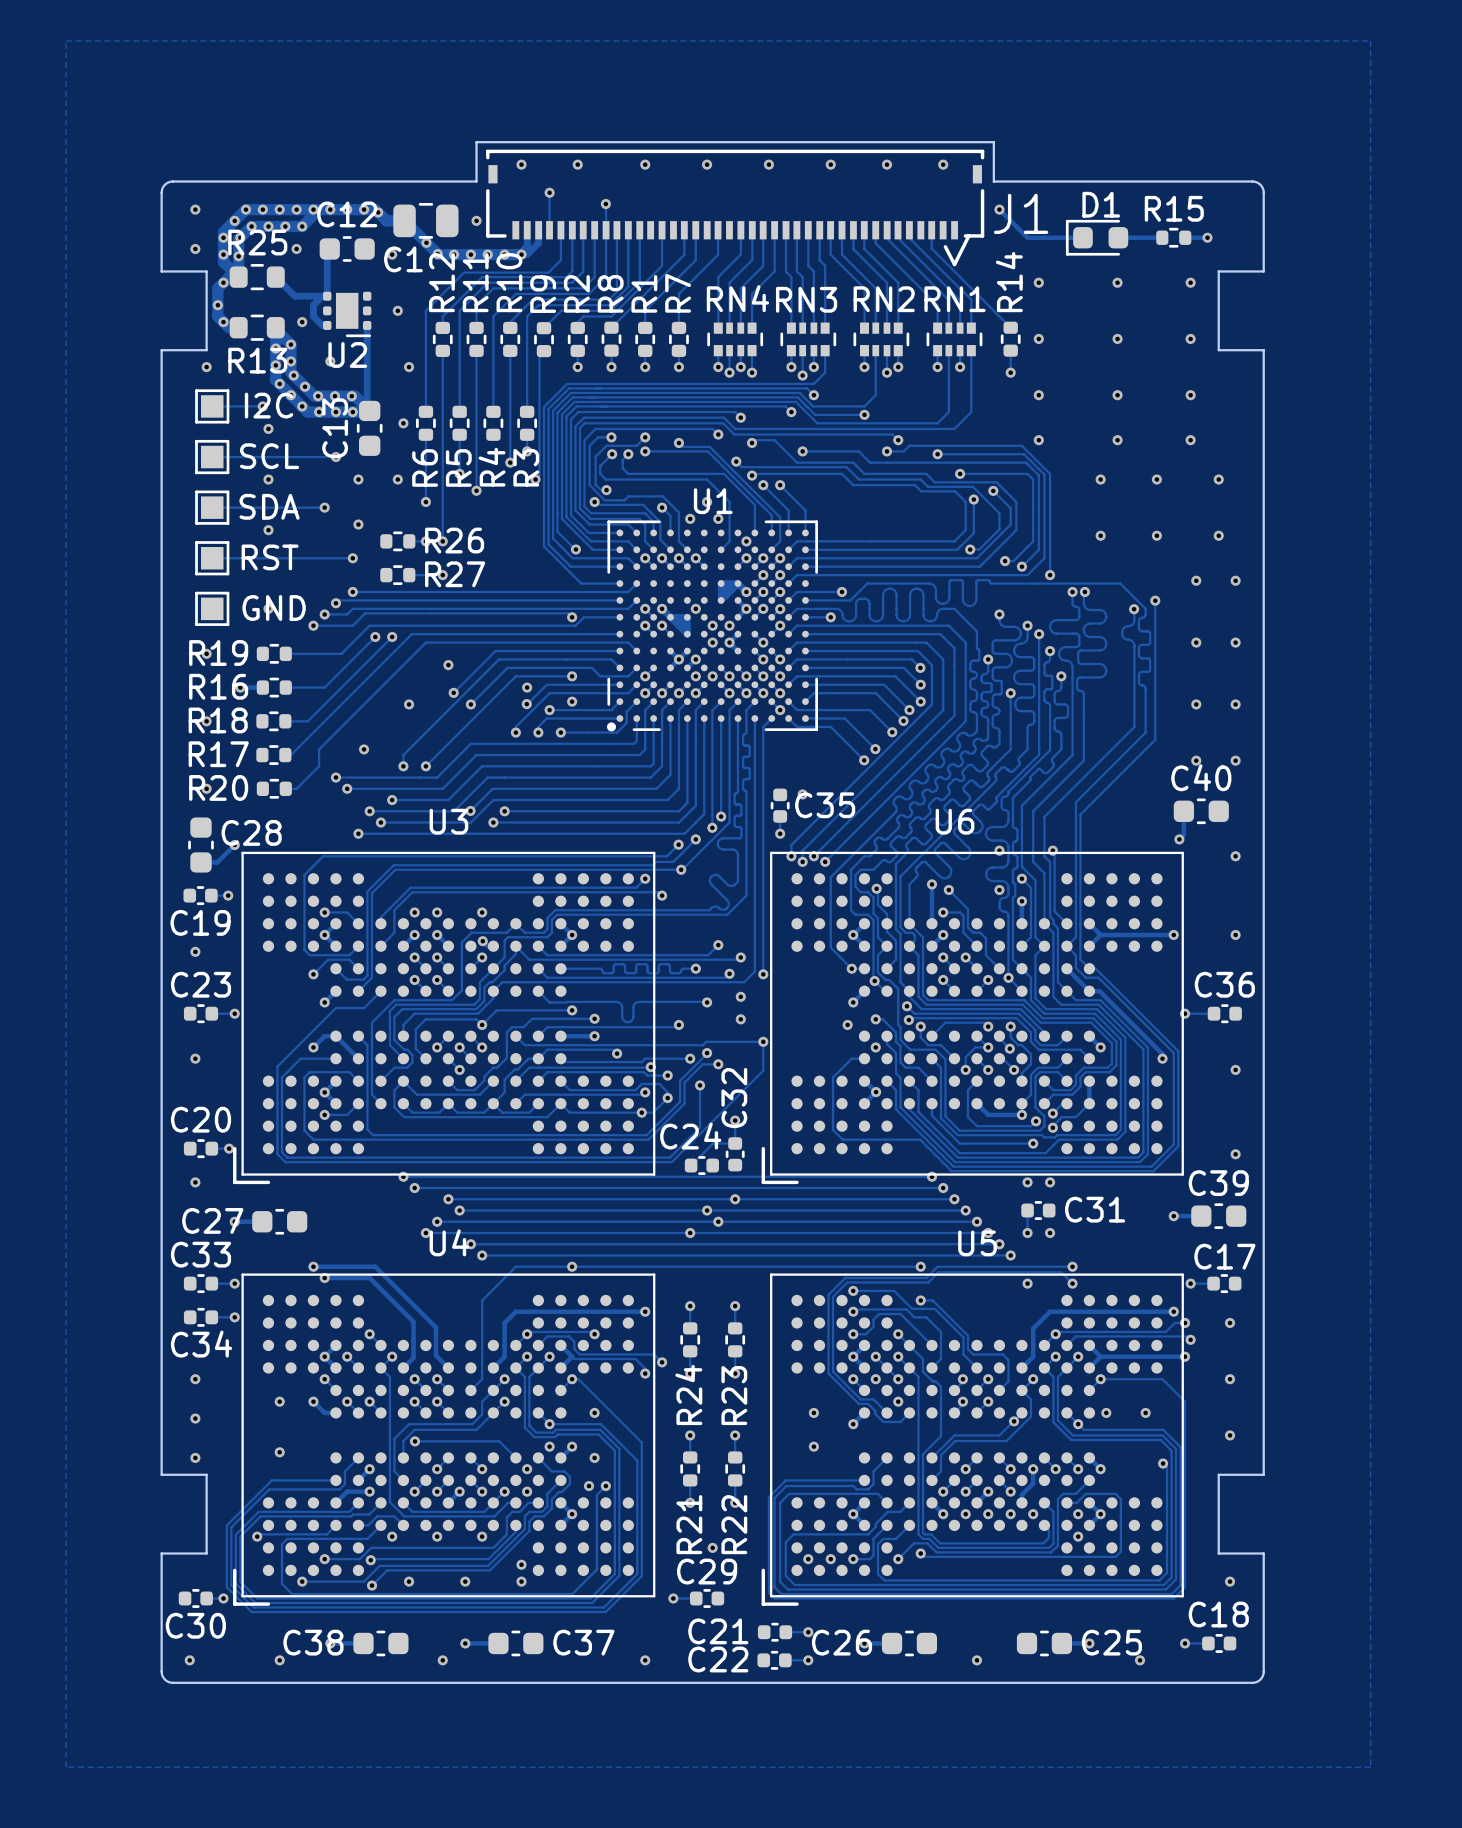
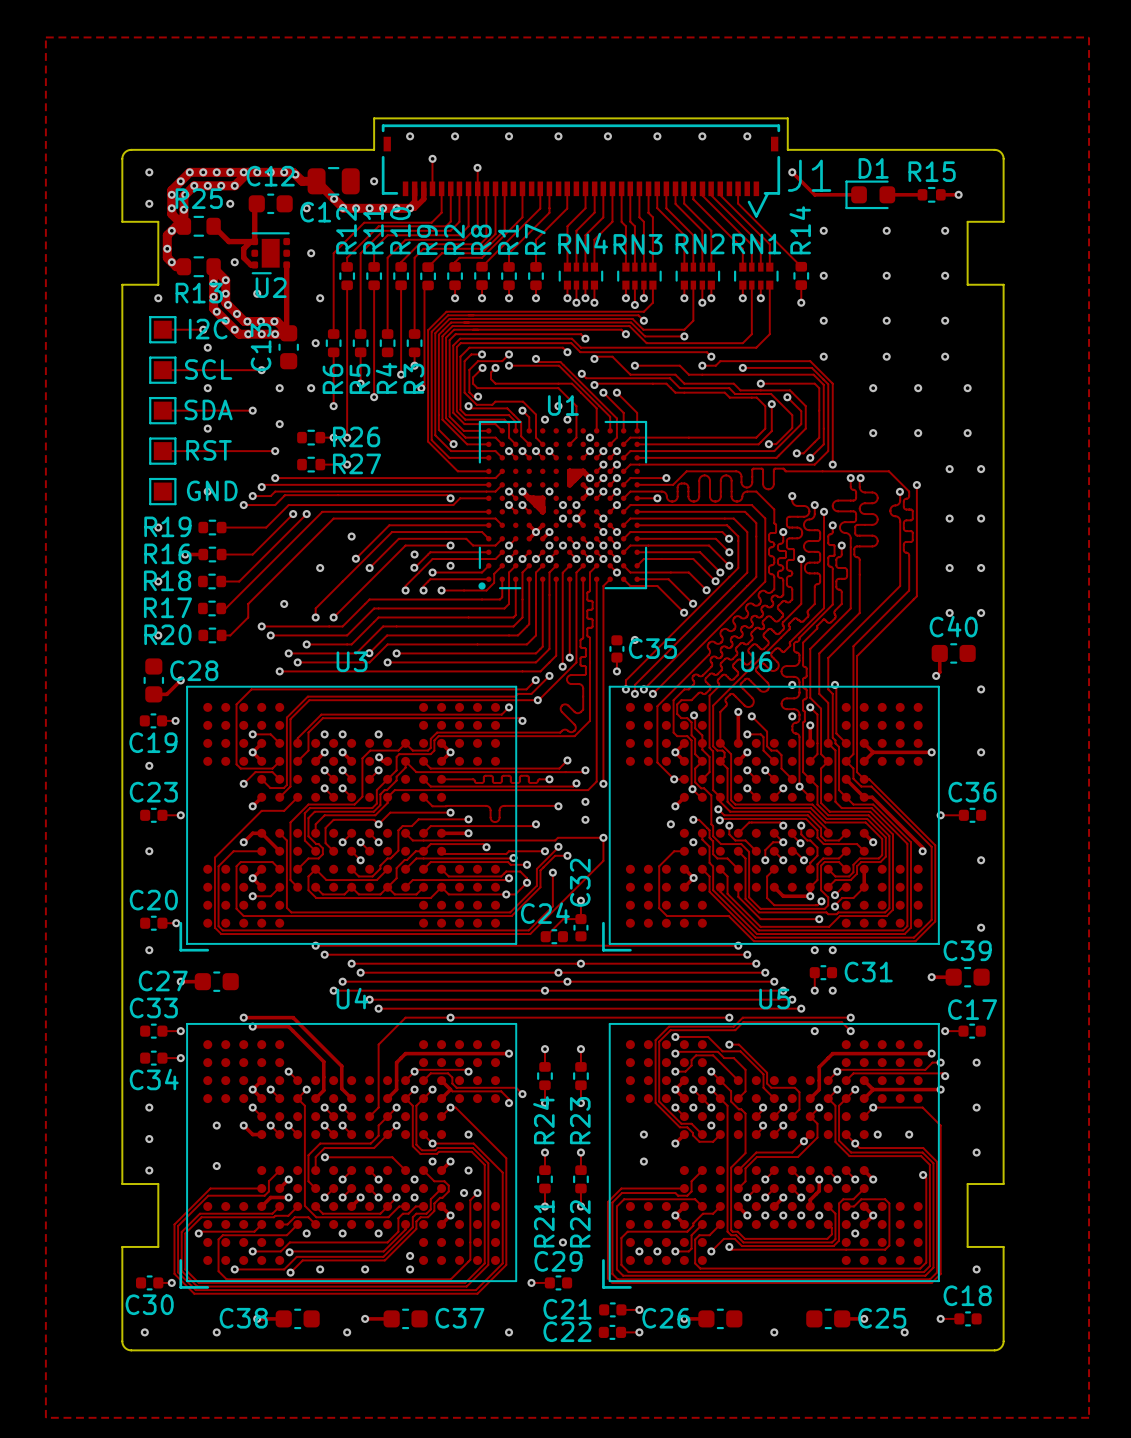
U2 footprint: [323, 291, 372, 338] -> [251, 232, 291, 275]

